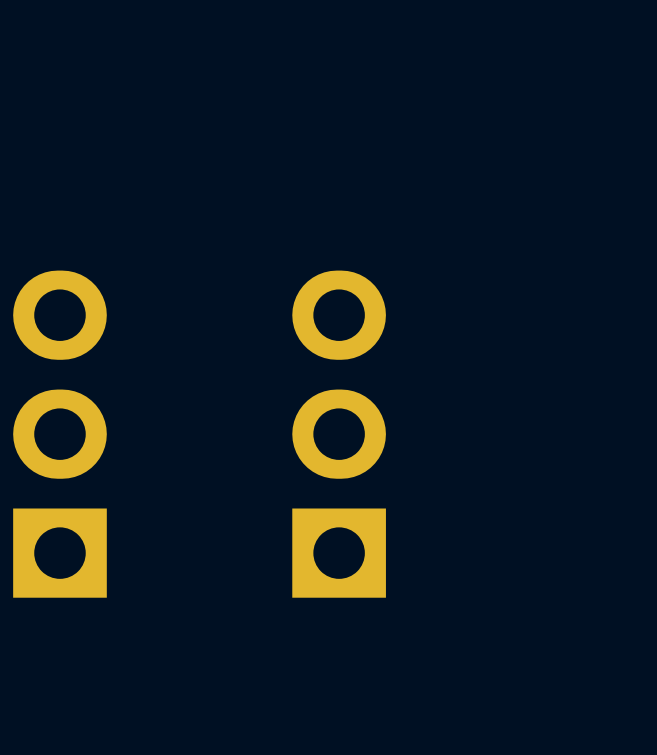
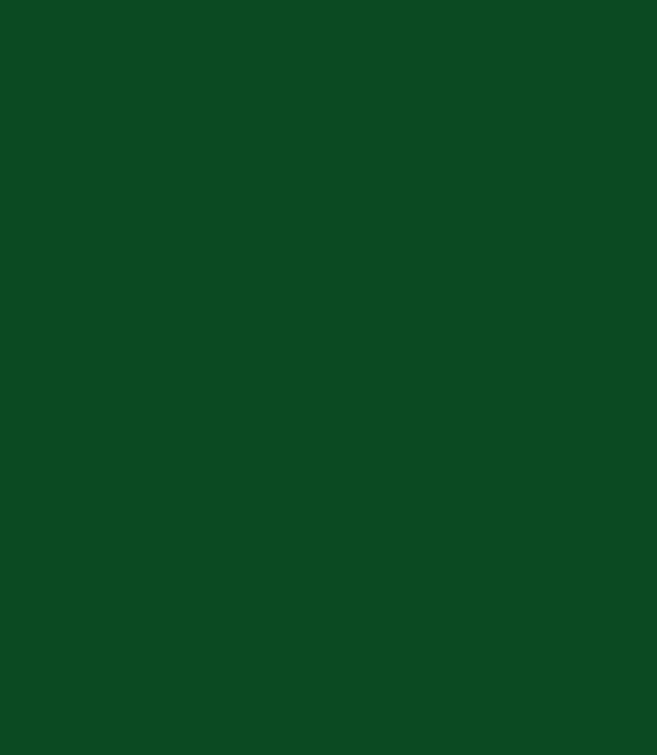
part: (59, 434) -> none
part: (339, 434) -> none

